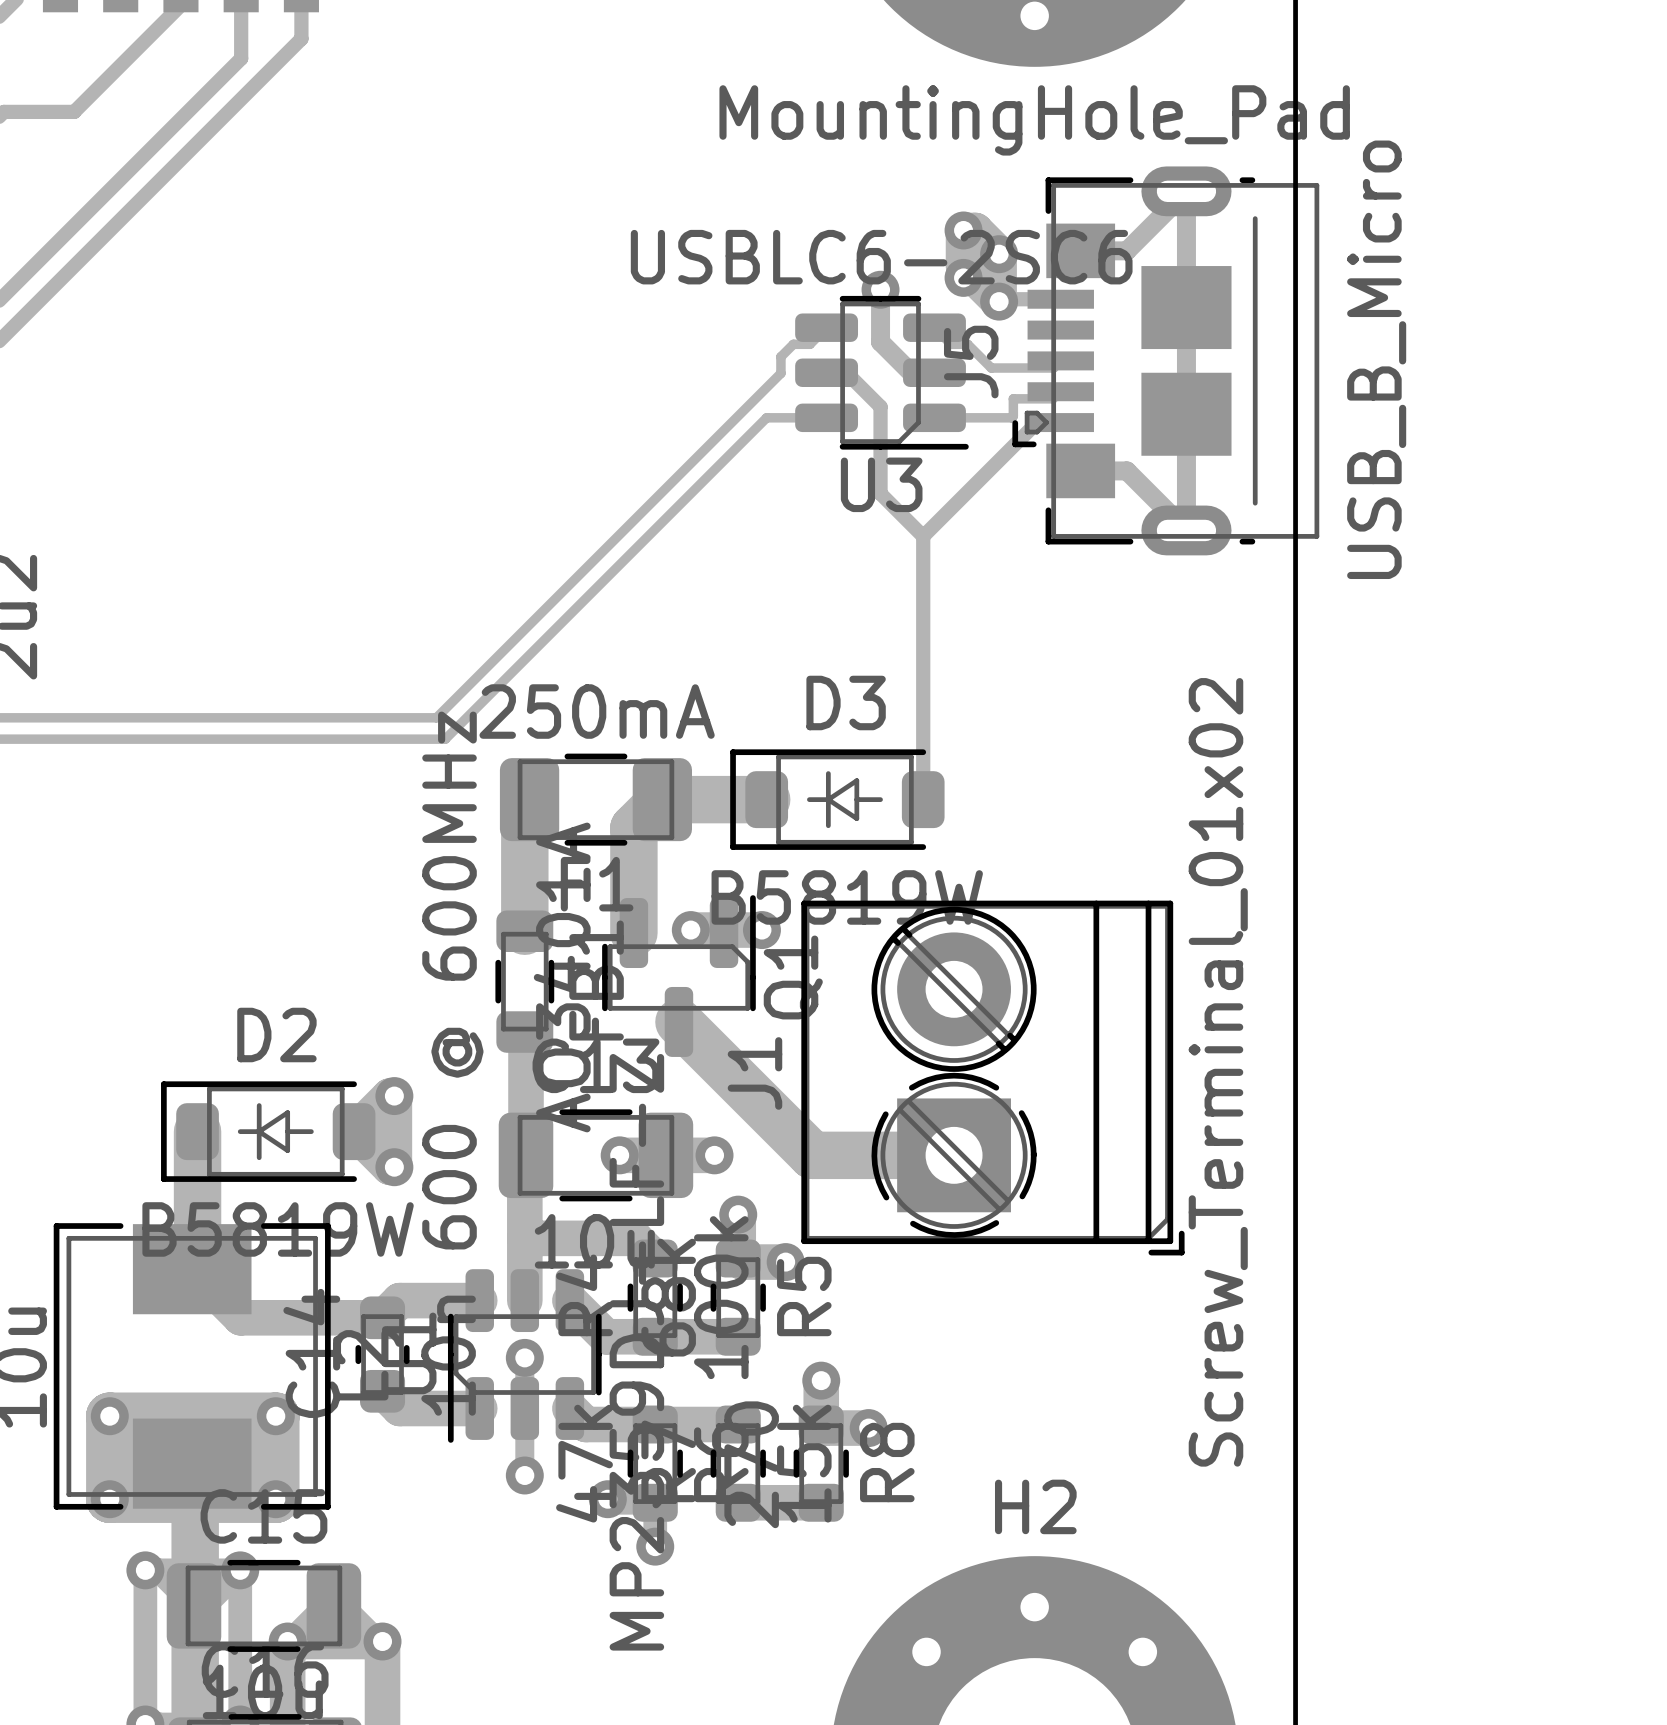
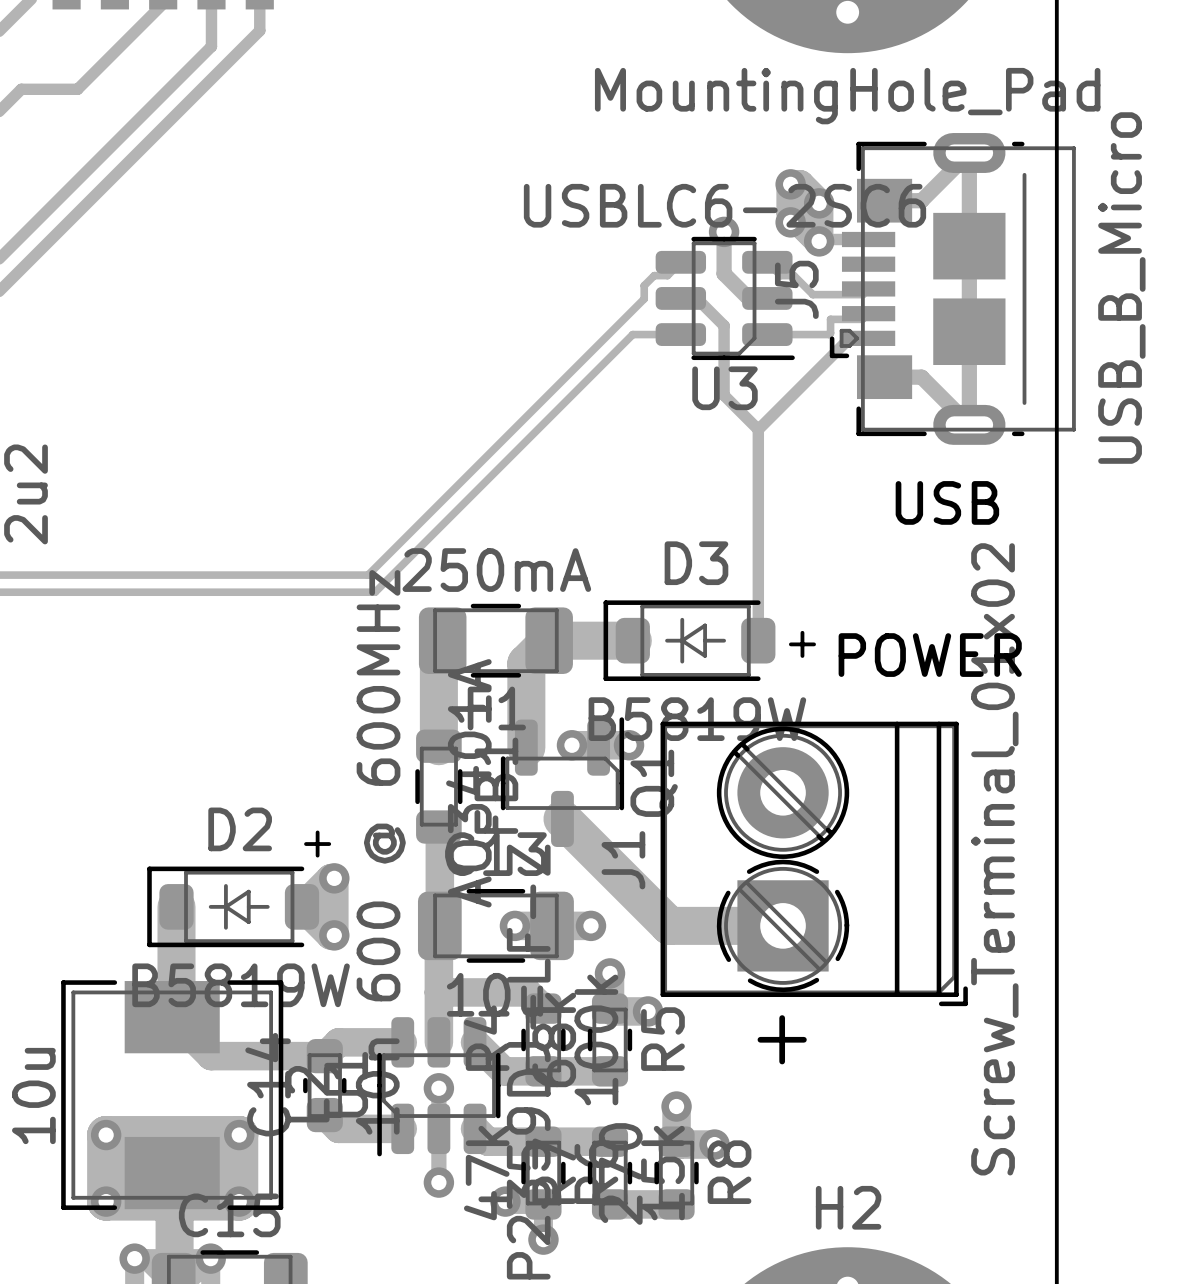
text: none -> USB (947, 502)
text: none -> + (802, 644)
text: none -> POWER (930, 655)
text: none -> + (317, 844)
text: none -> + (782, 1039)

